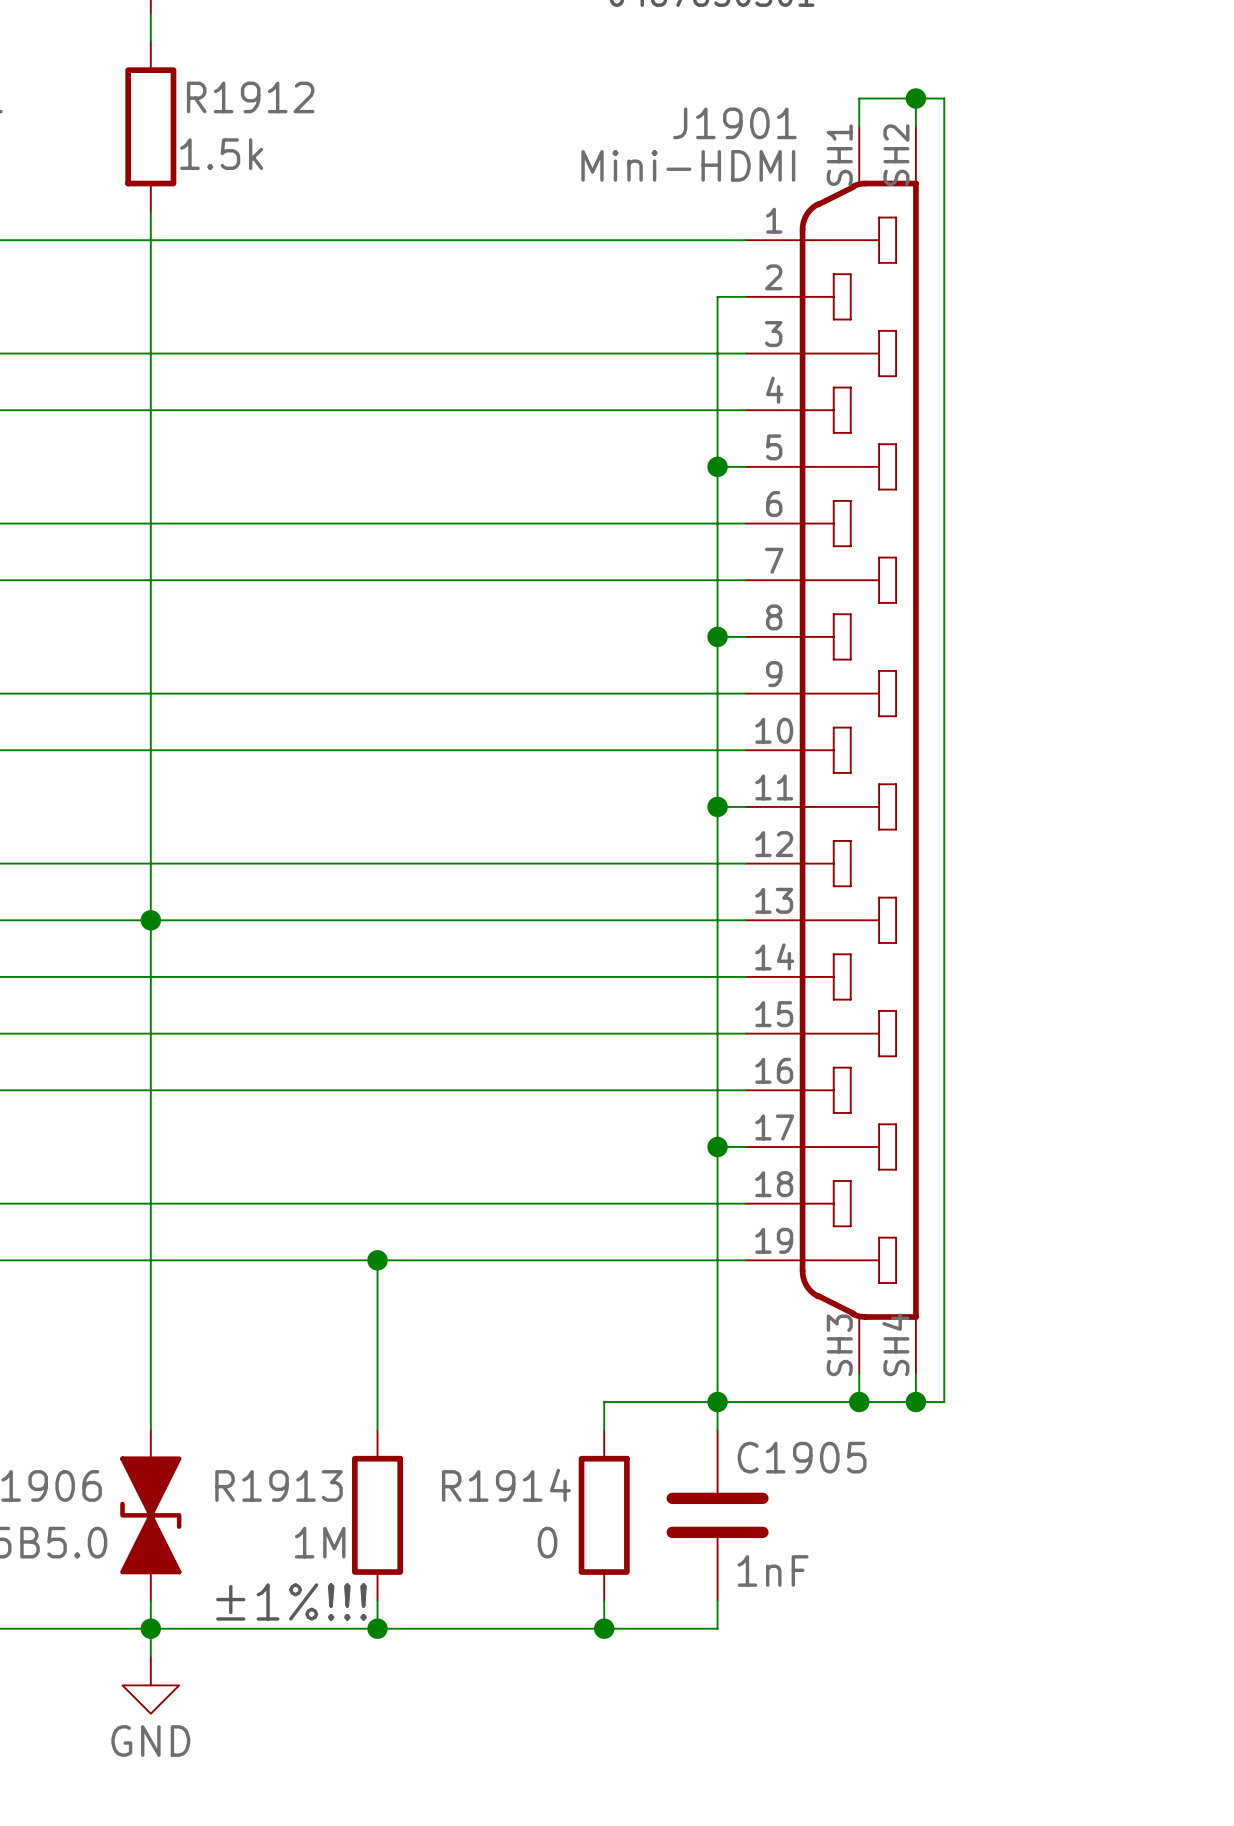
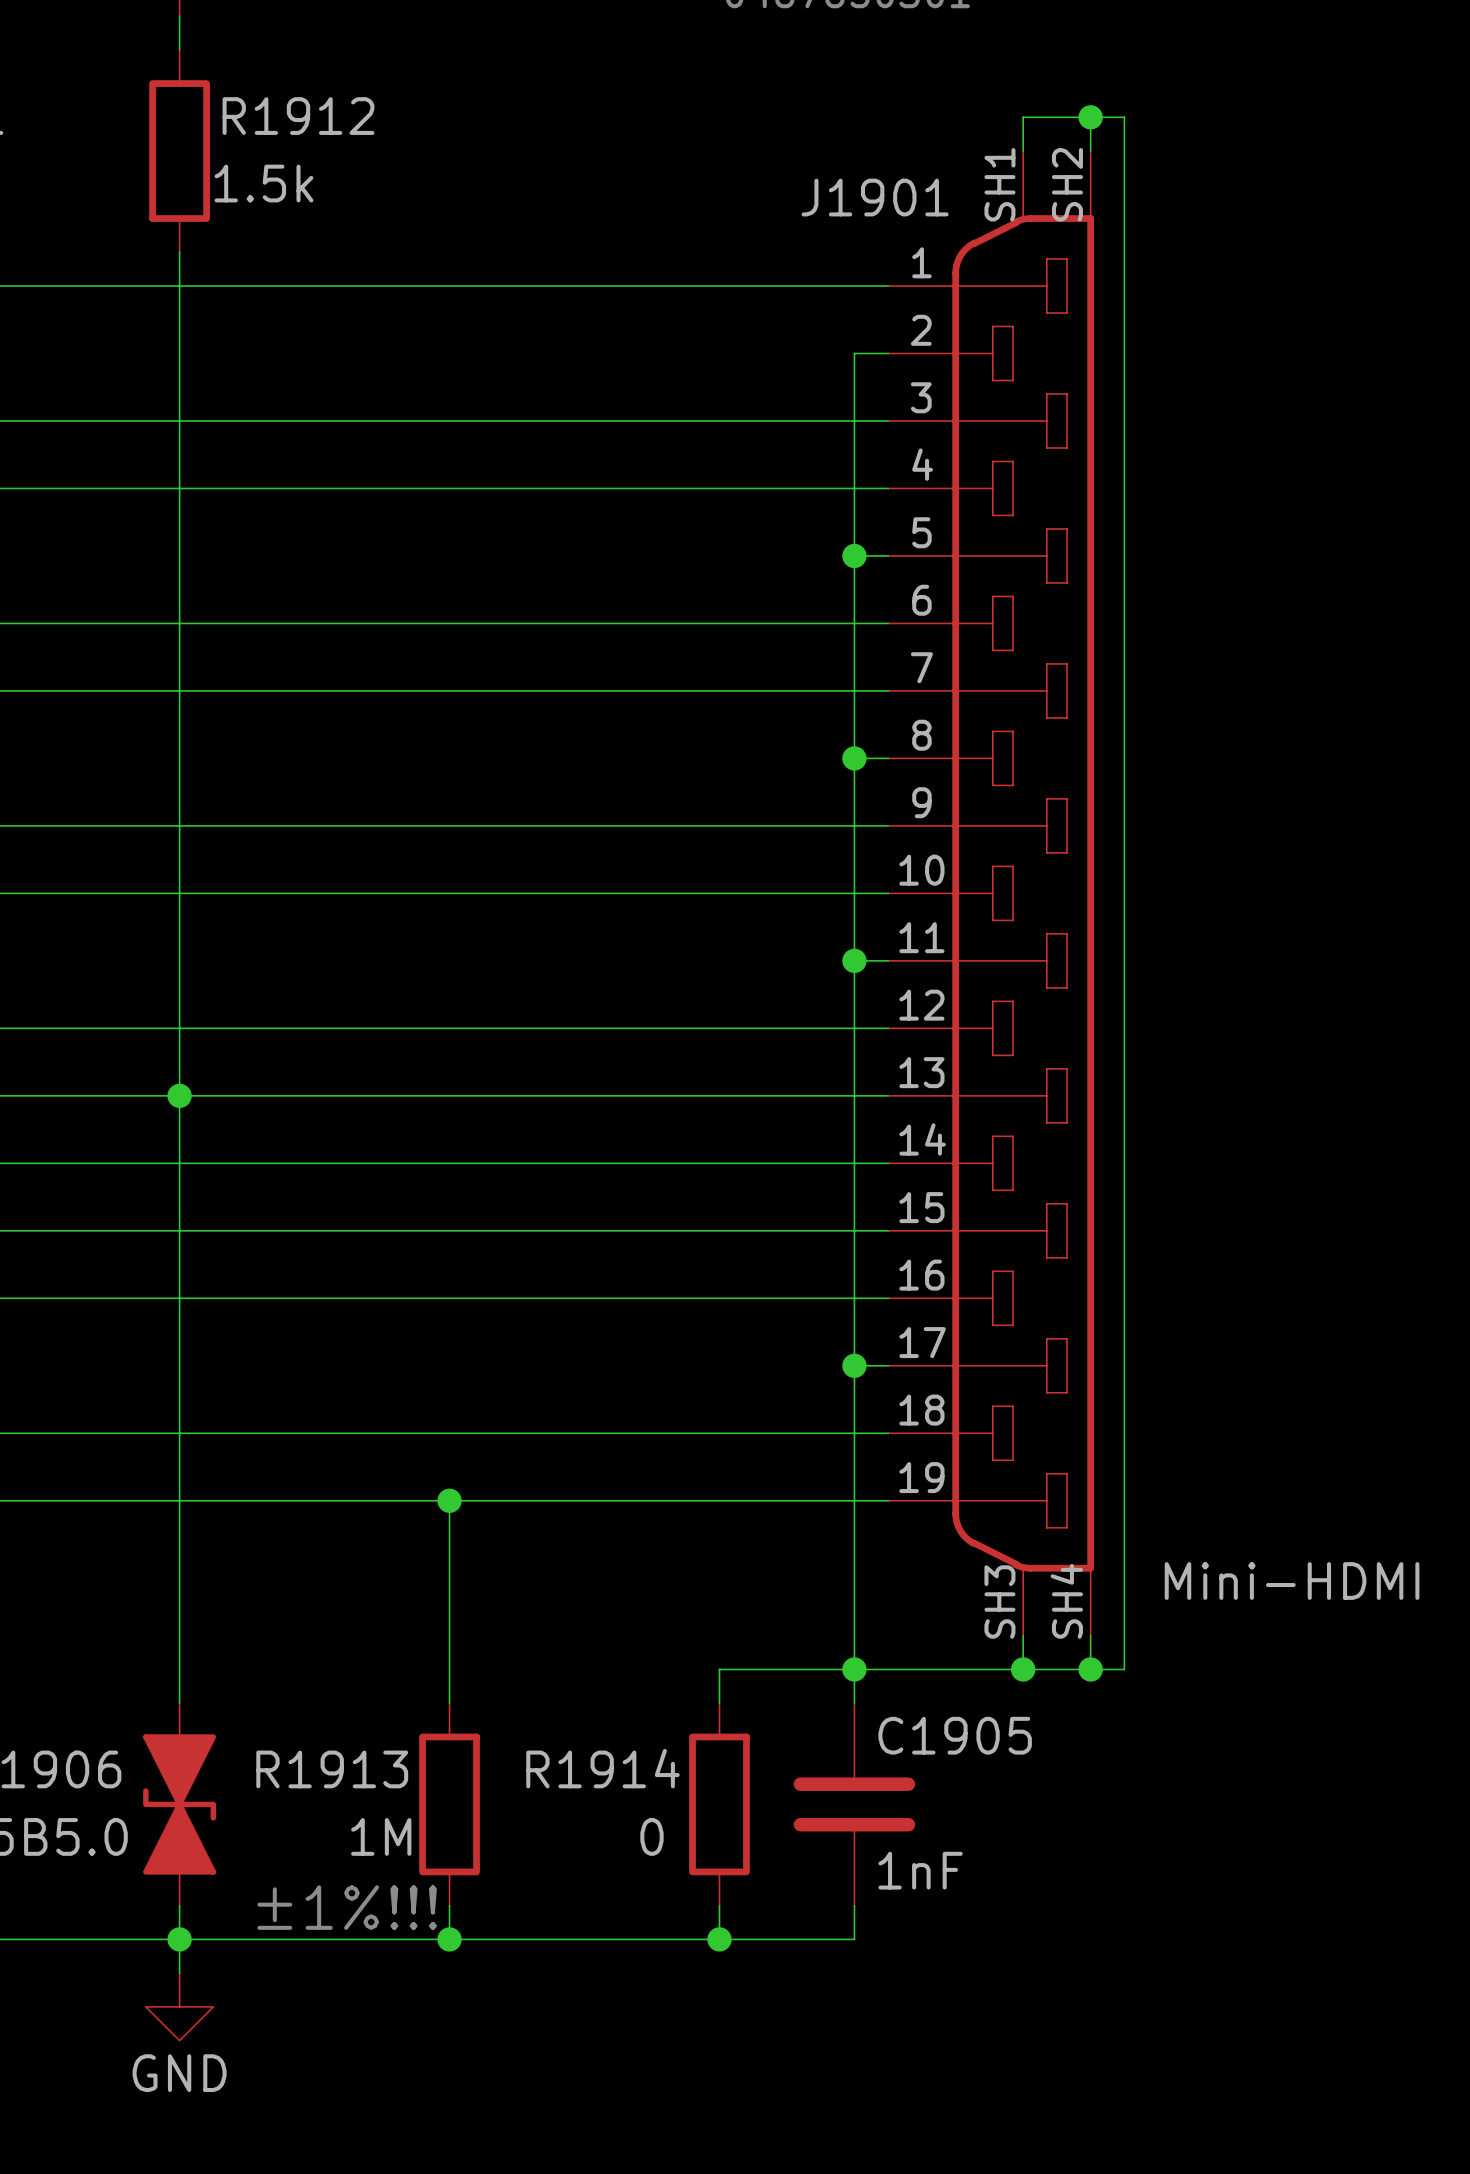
J1901 name position: J1901 (734, 123) -> J1901 (875, 197)
J1901 value position: Mini-HDMI (688, 165) -> Mini-HDMI (1292, 1580)

